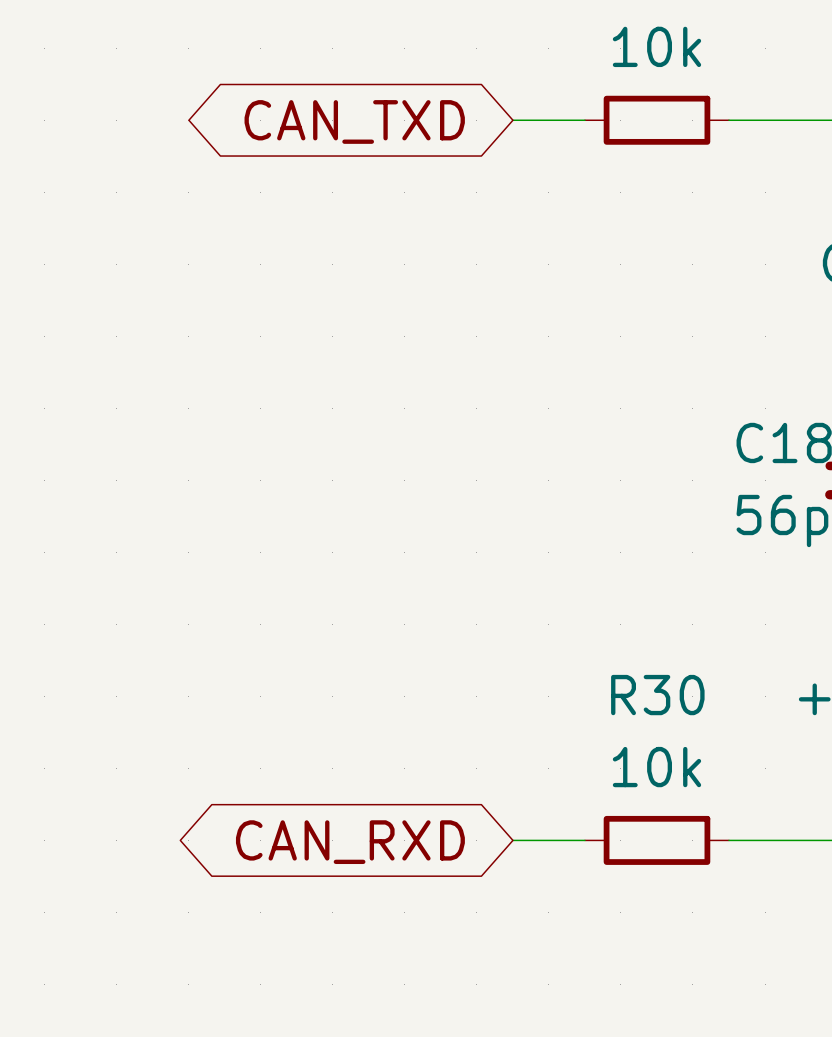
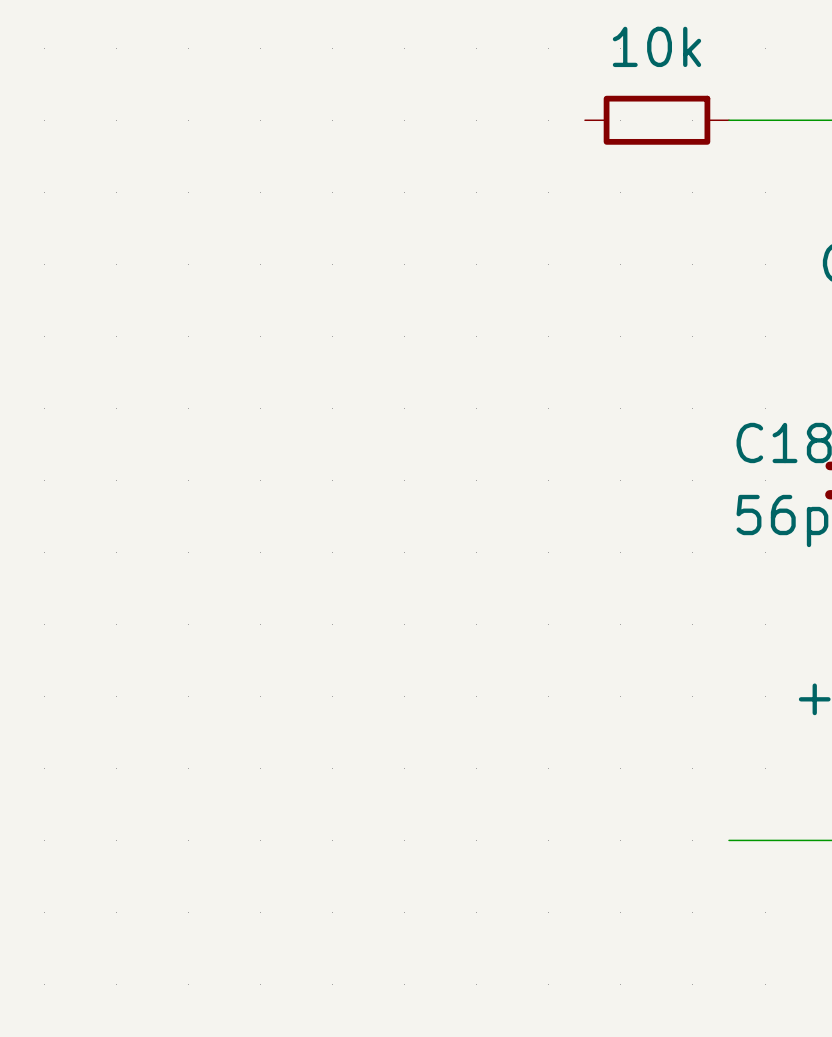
wire: (512, 120) (584, 120) -> none
global label: CAN_TXD (354, 121) -> none
wire: (512, 840) (584, 840) -> none
R30: 10k (656, 840) -> none
global label: CAN_RXD (350, 842) -> none

